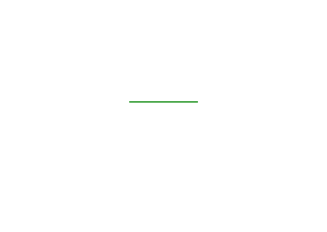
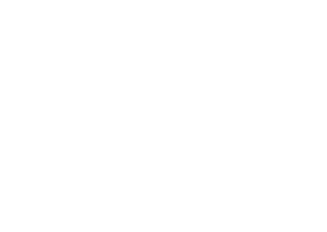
wire: (129, 101) (197, 101) -> none

